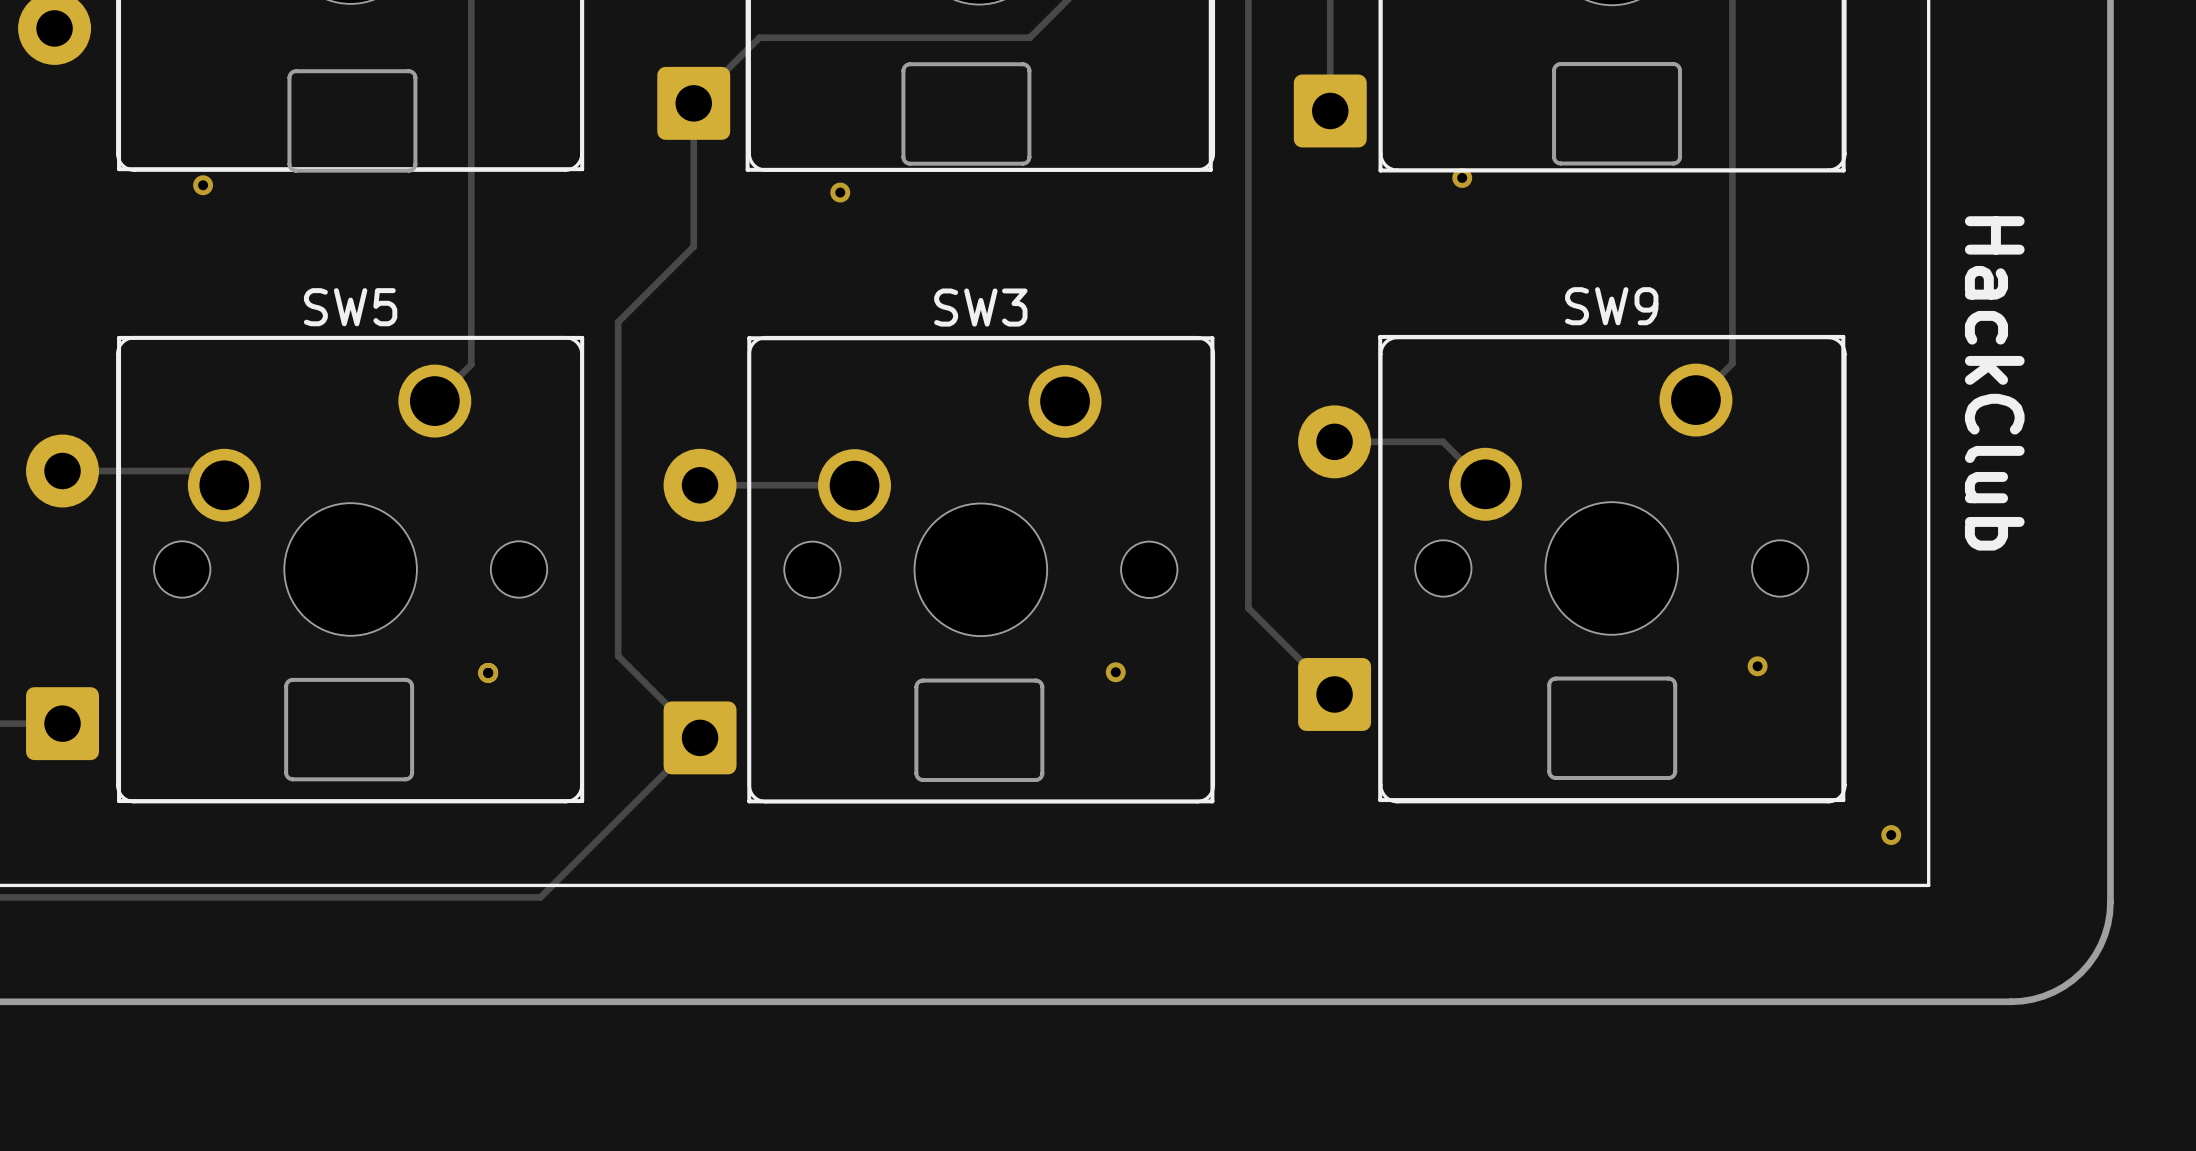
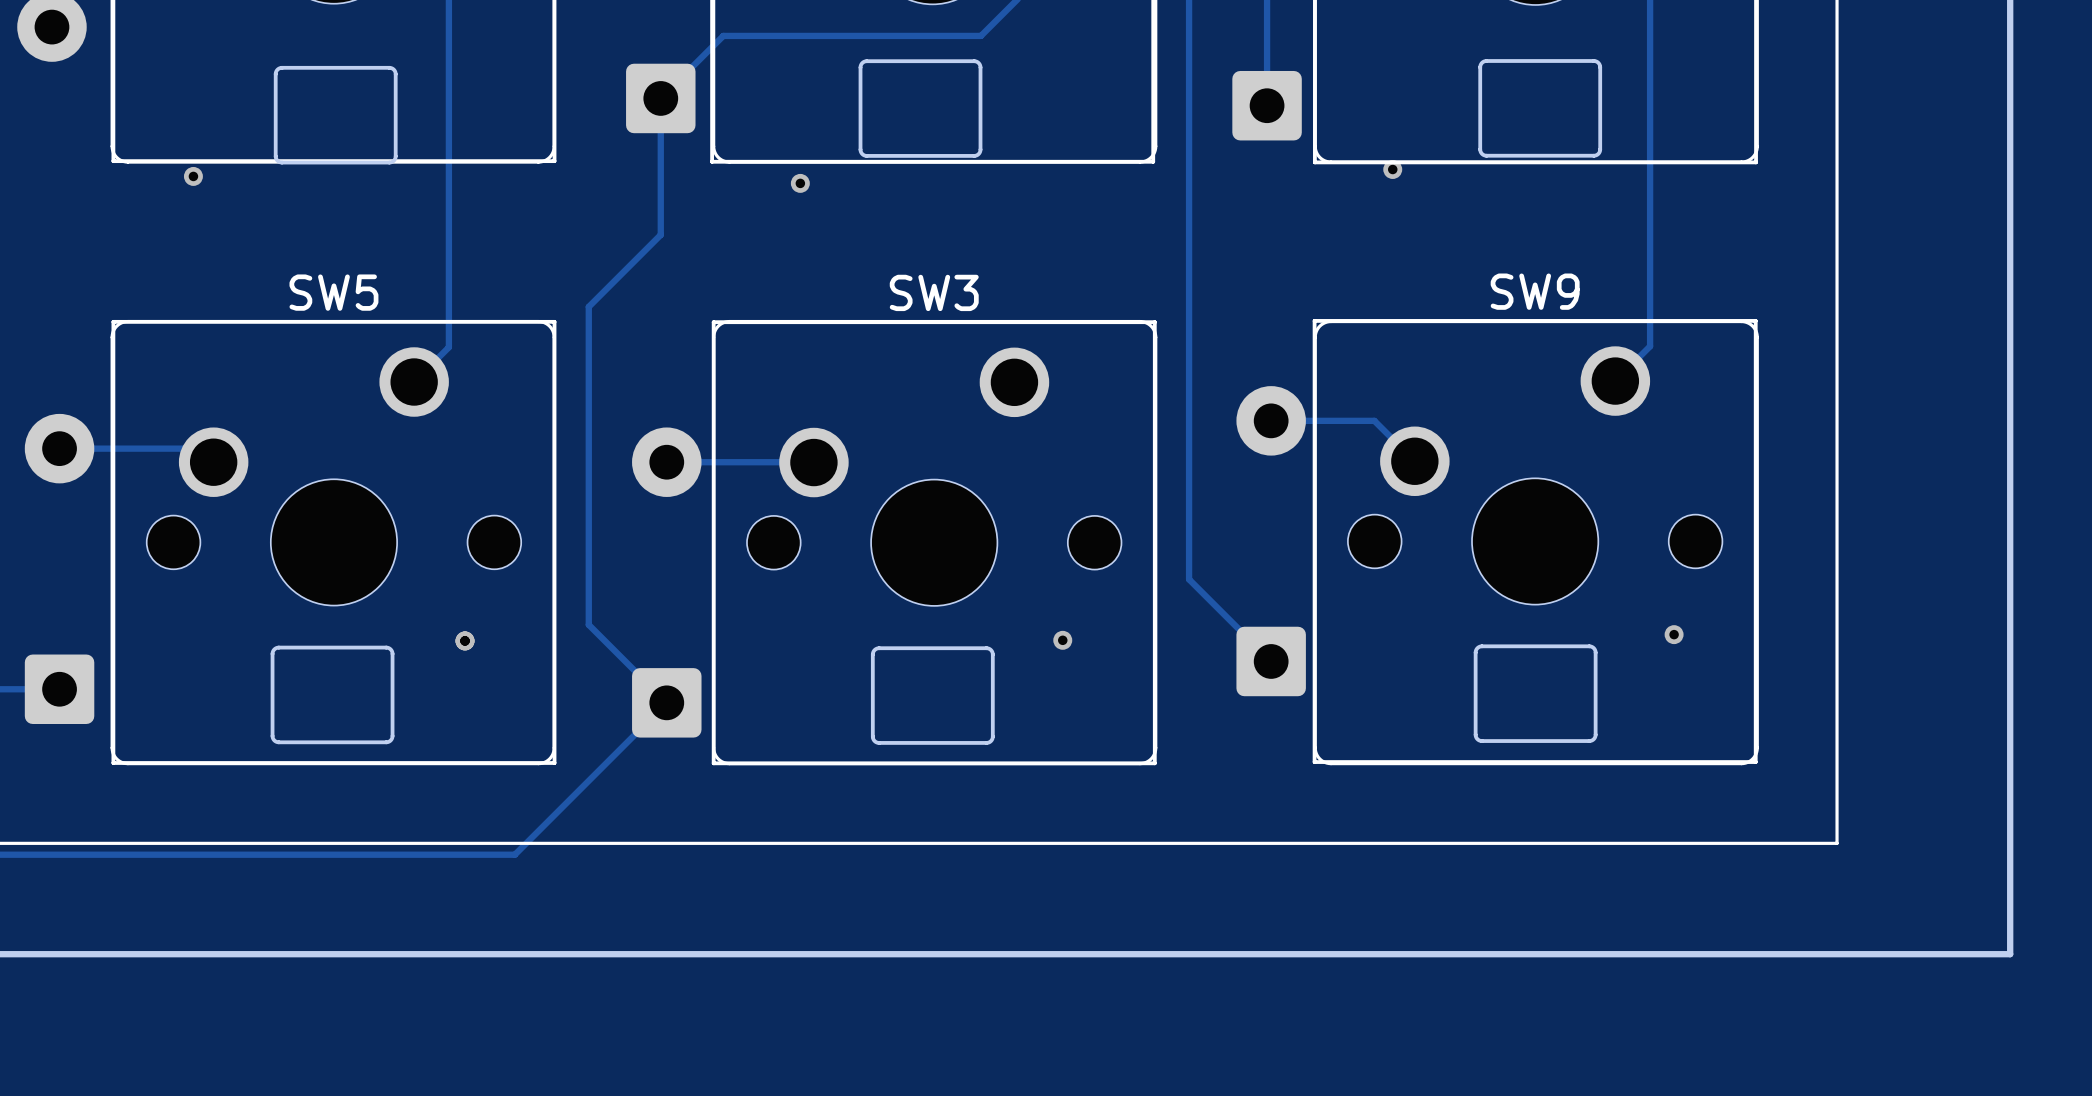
text: HackClub (1994, 383) -> none
via: (1891, 835) -> none
board edge: (2110, 902) (2104, 935) (2095, 955) (2081, 972) (2054, 991) (2033, 999) (2011, 1001) -> (2010, 859) (2010, 954) (1915, 954)

